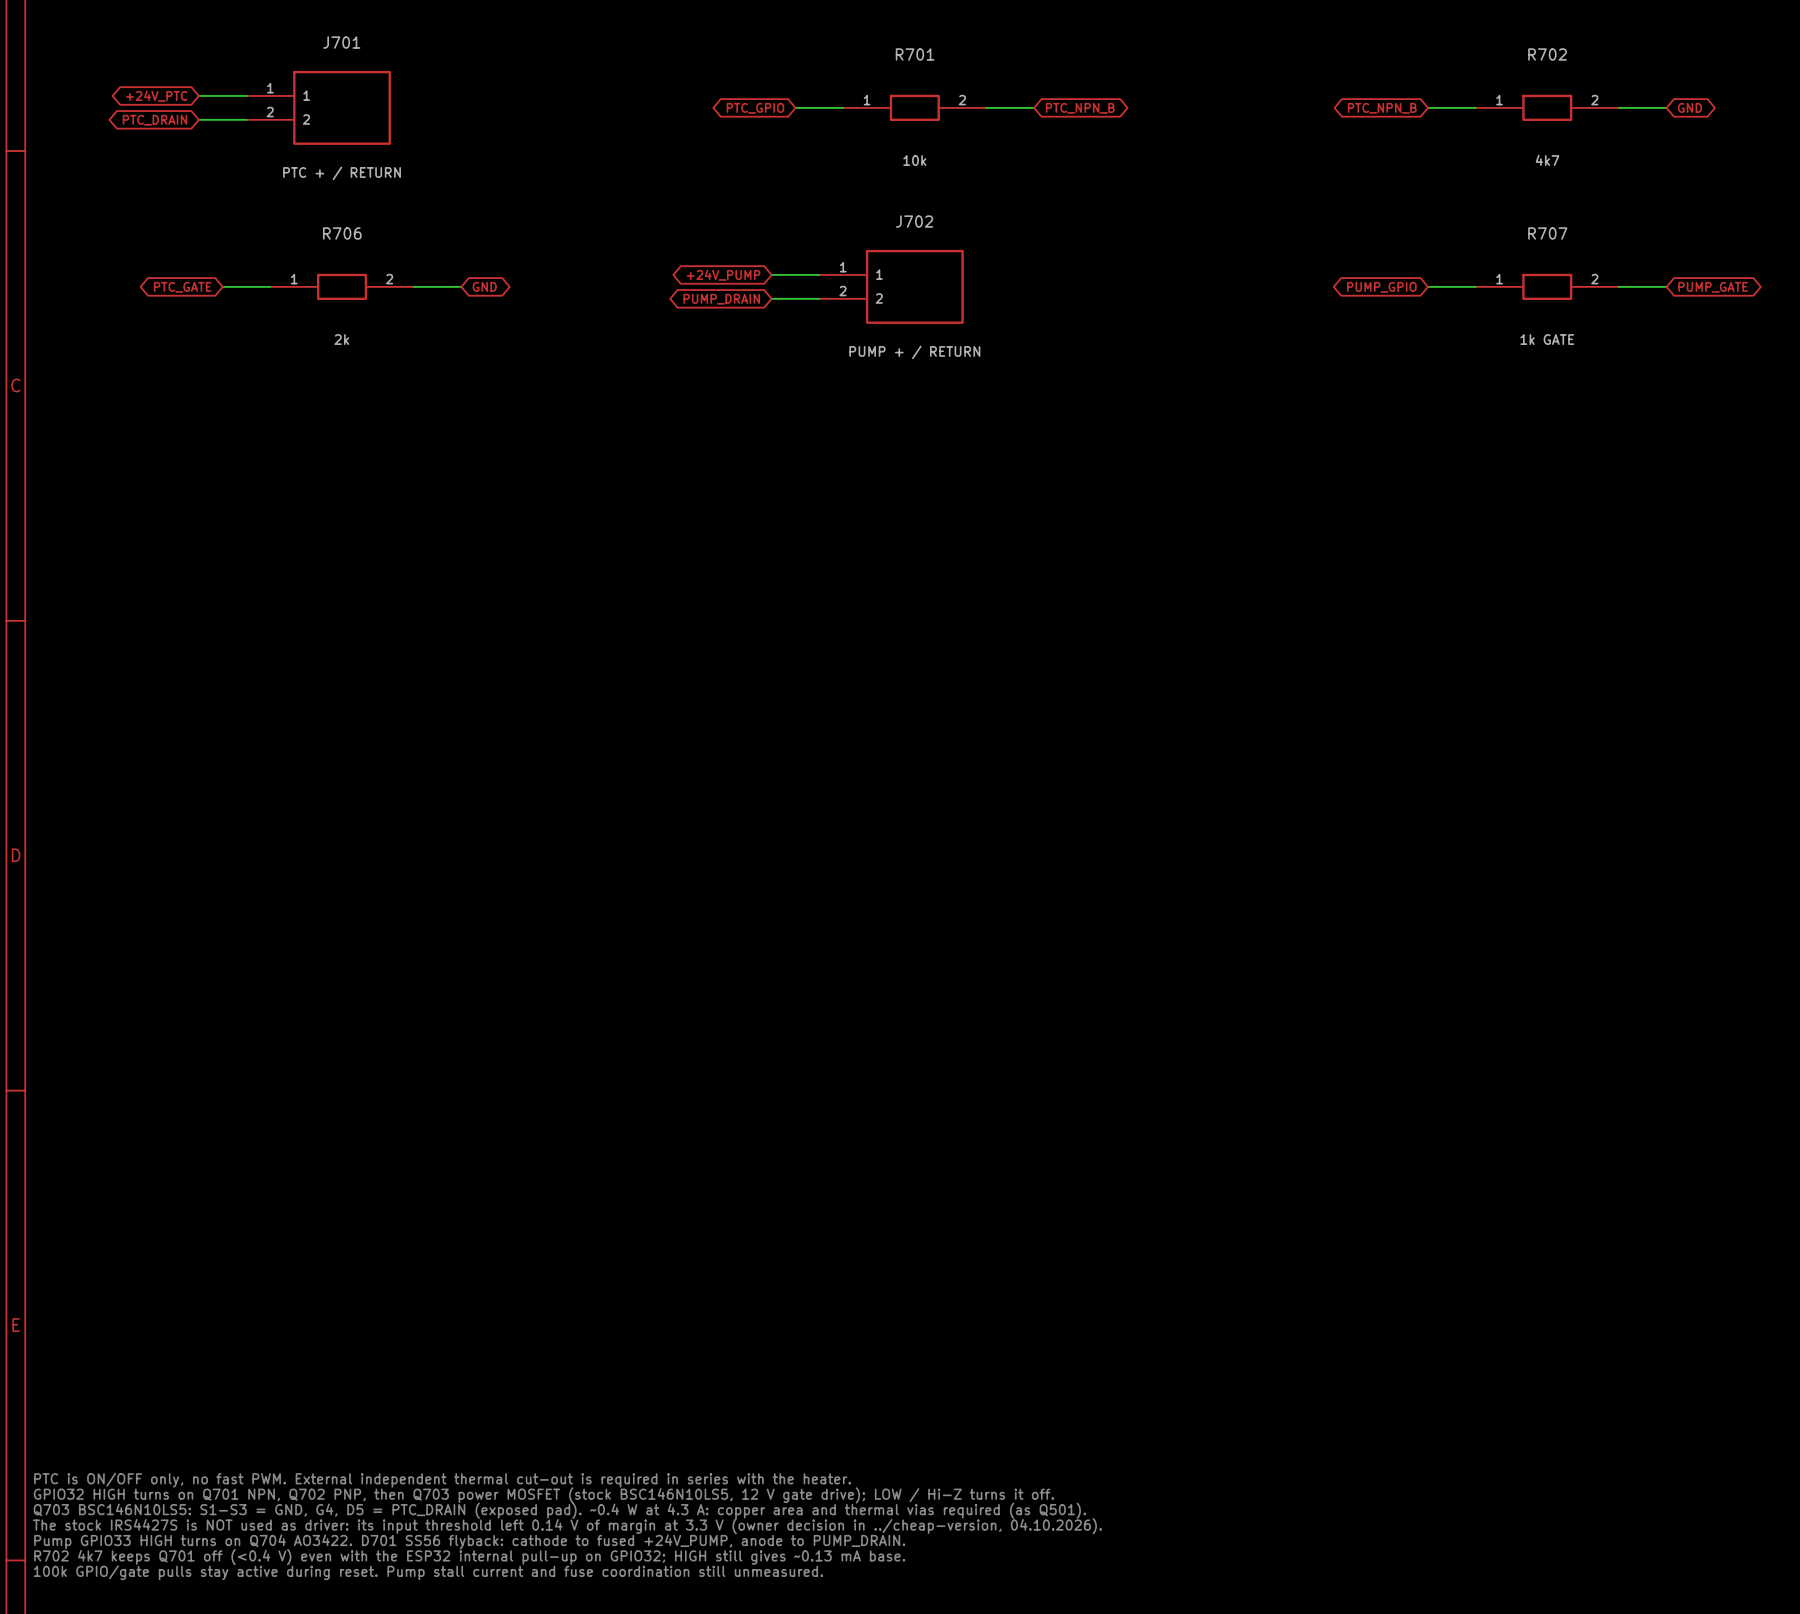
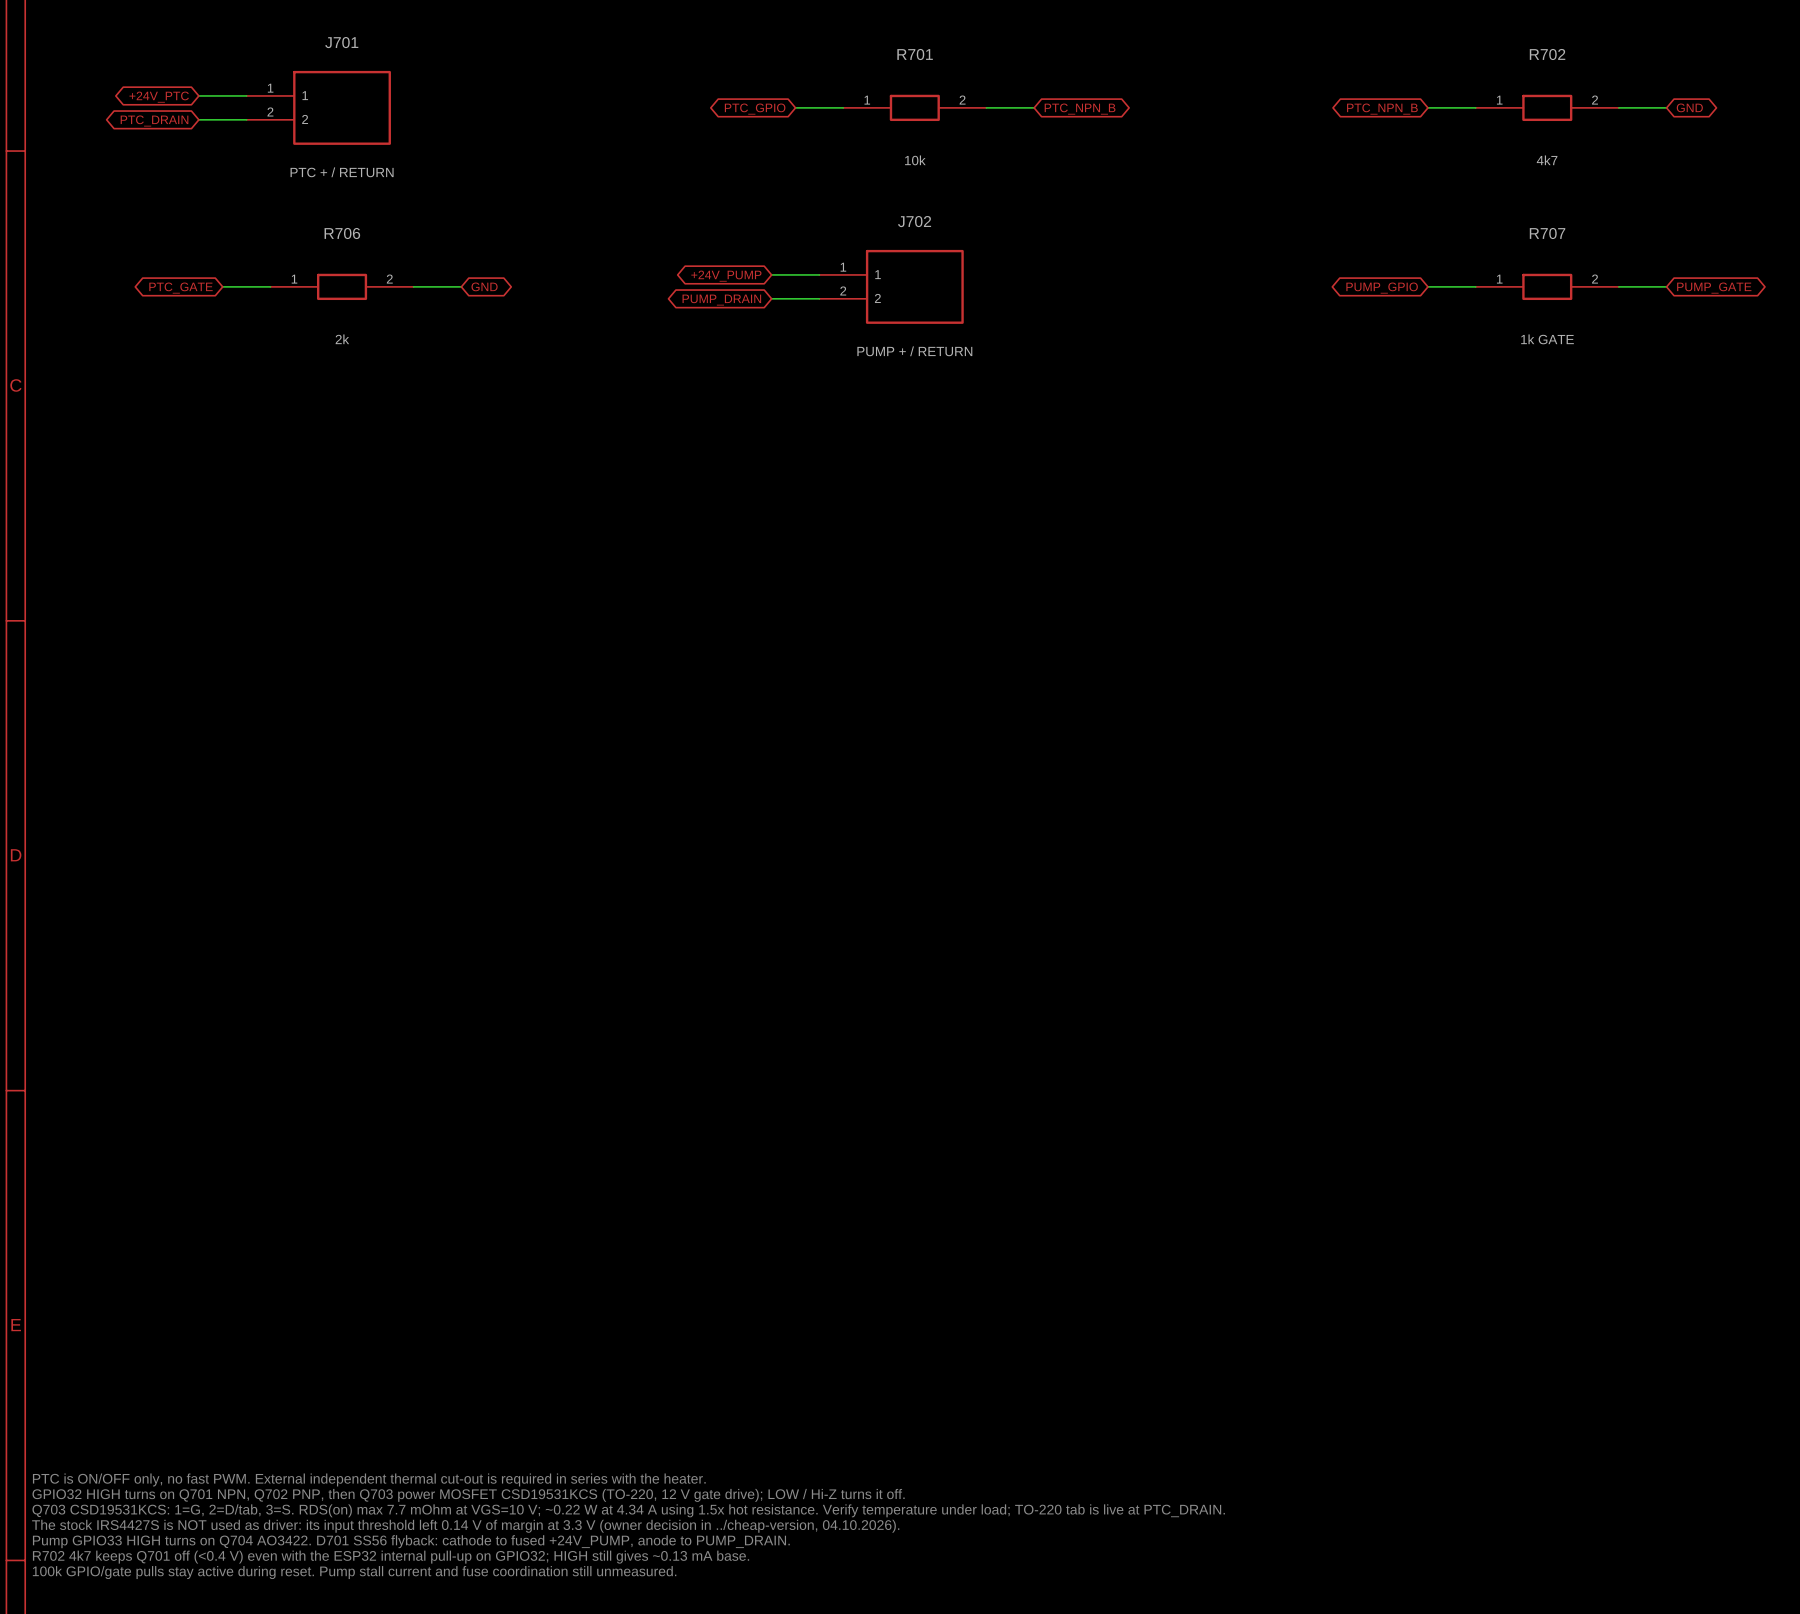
text: GPIO32 HIGH turns on Q701 NPN, Q702 PNP, then Q703 power MOSFET (stock BSC146N10LS5, 12 V gate drive); LOW / Hi-Z turns it off. (543, 1495) -> GPIO32 HIGH turns on Q701 NPN, Q702 PNP, then Q703 power MOSFET CSD19531KCS (TO-220, 12 V gate drive); LOW / Hi-Z turns it off. (468, 1495)
text: Q703 BSC146N10LS5: S1-S3 = GND, G4, D5 = PTC_DRAIN (exposed pad). ~0.4 W at 4.3 A: copper area and thermal vias required (as Q501). (559, 1510) -> Q703 CSD19531KCS: 1=G, 2=D/tab, 3=S. RDS(on) max 7.7 mOhm at VGS=10 V; ~0.22 W at 4.34 A using 1.5x hot resistance. Verify temperature under load; TO-220 tab is live at PTC_DRAIN. (628, 1510)

